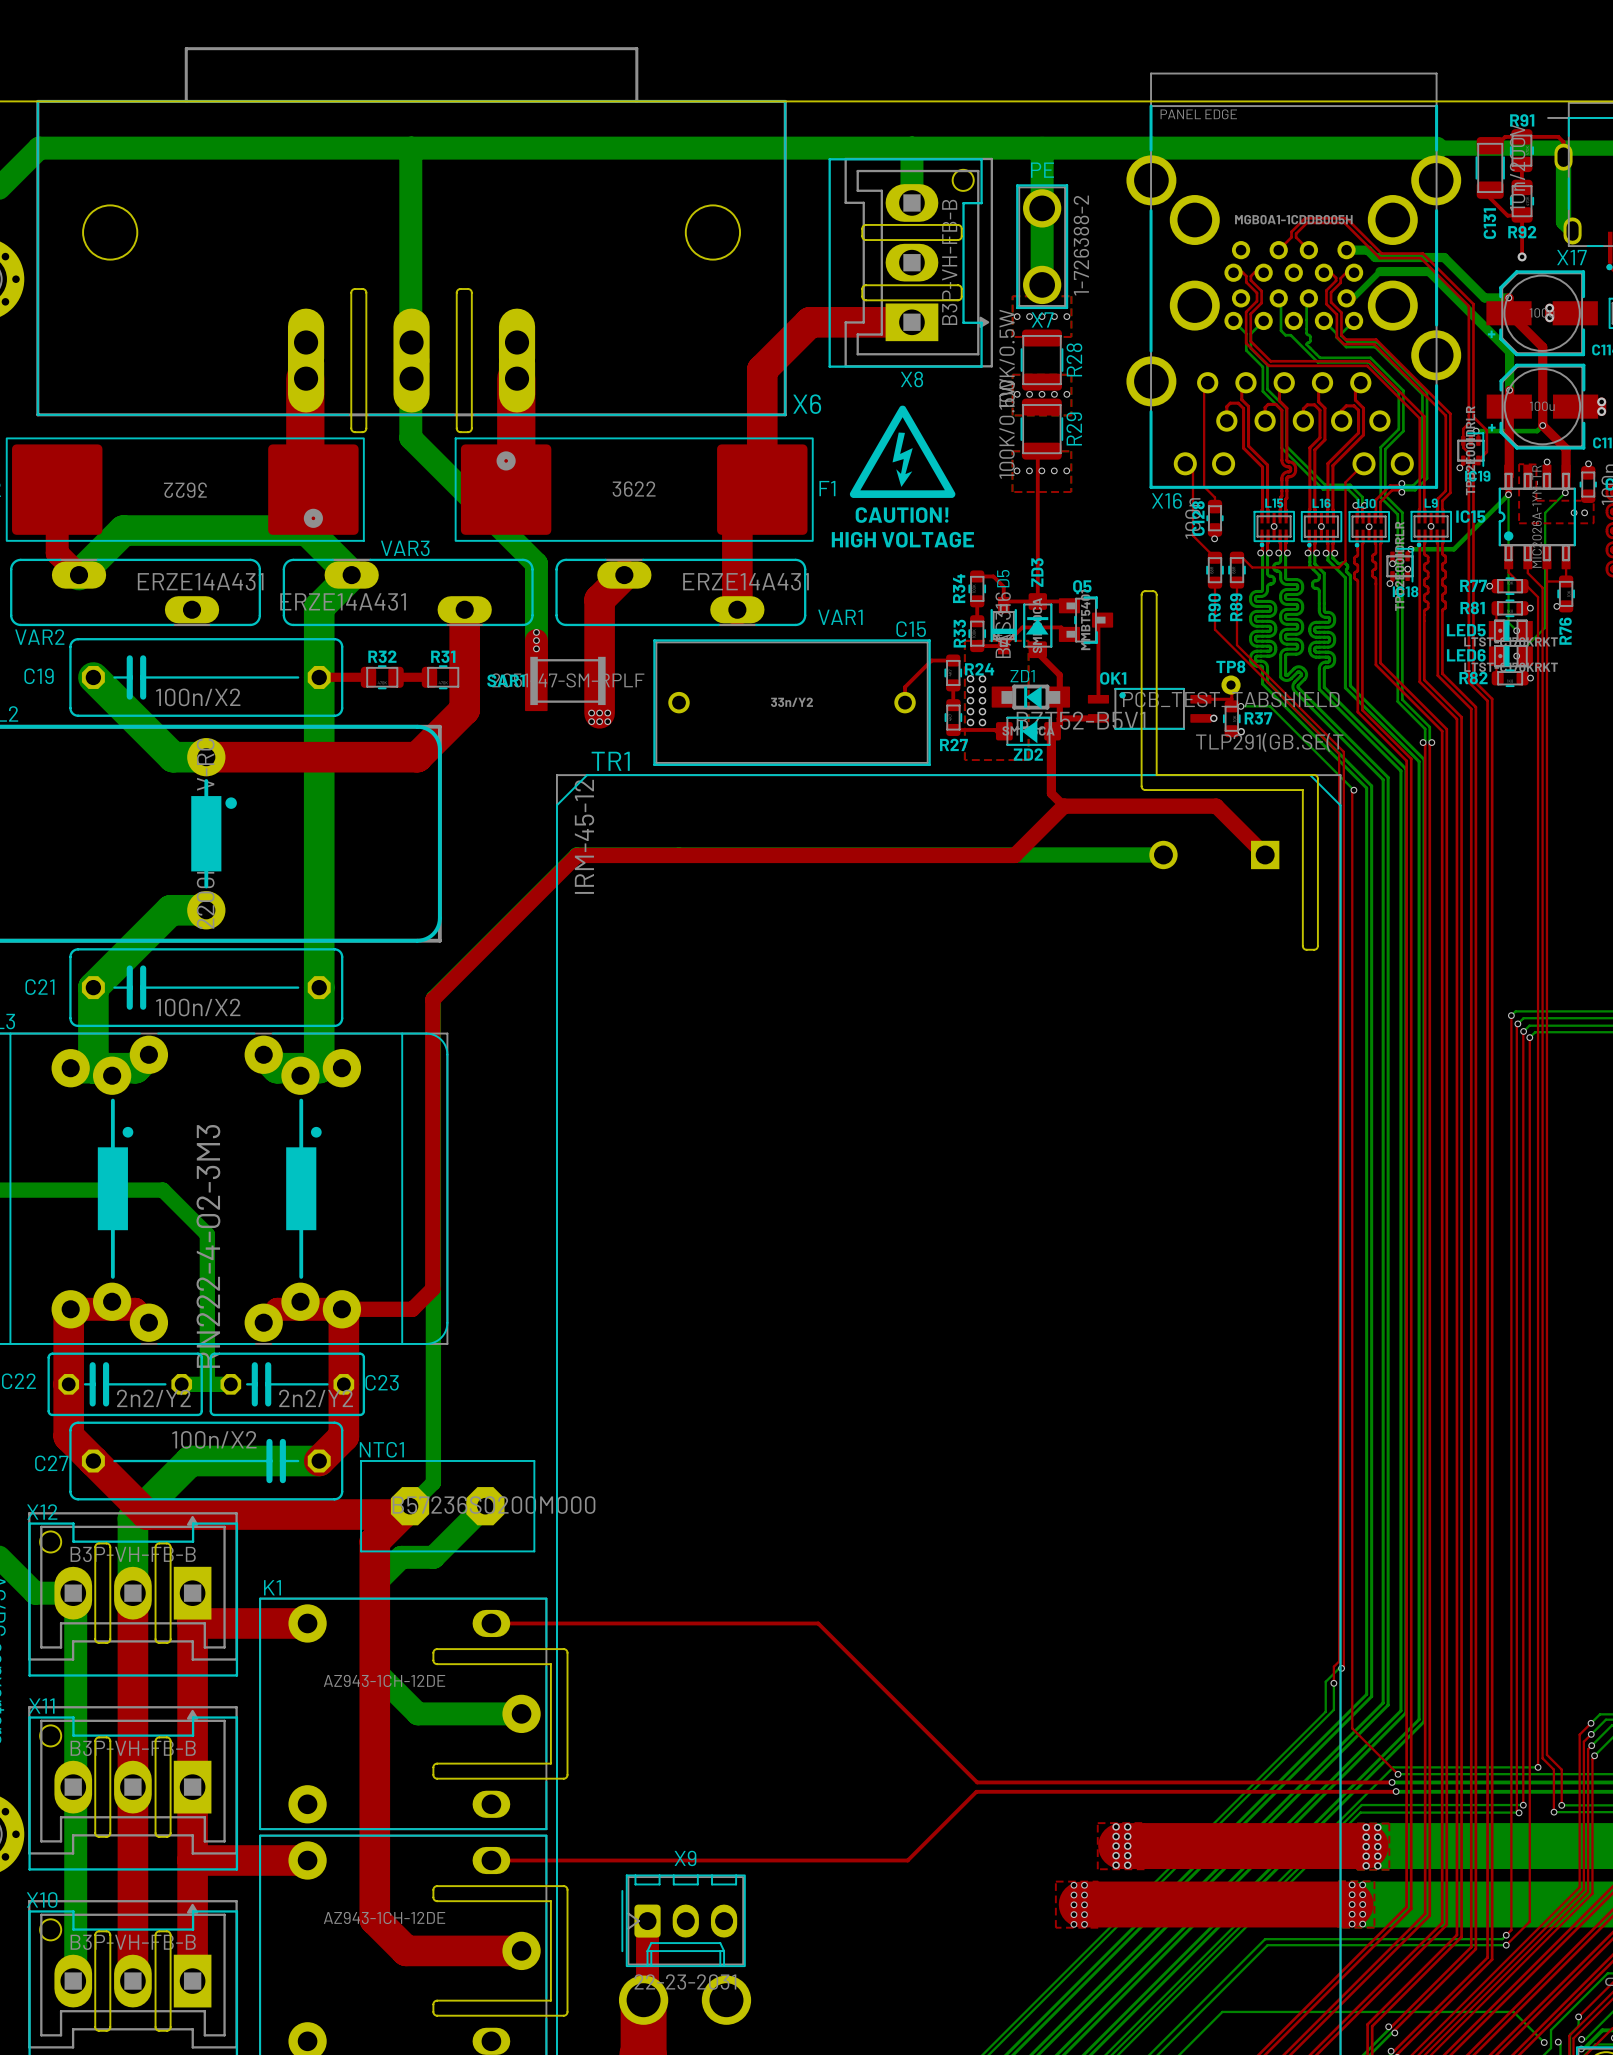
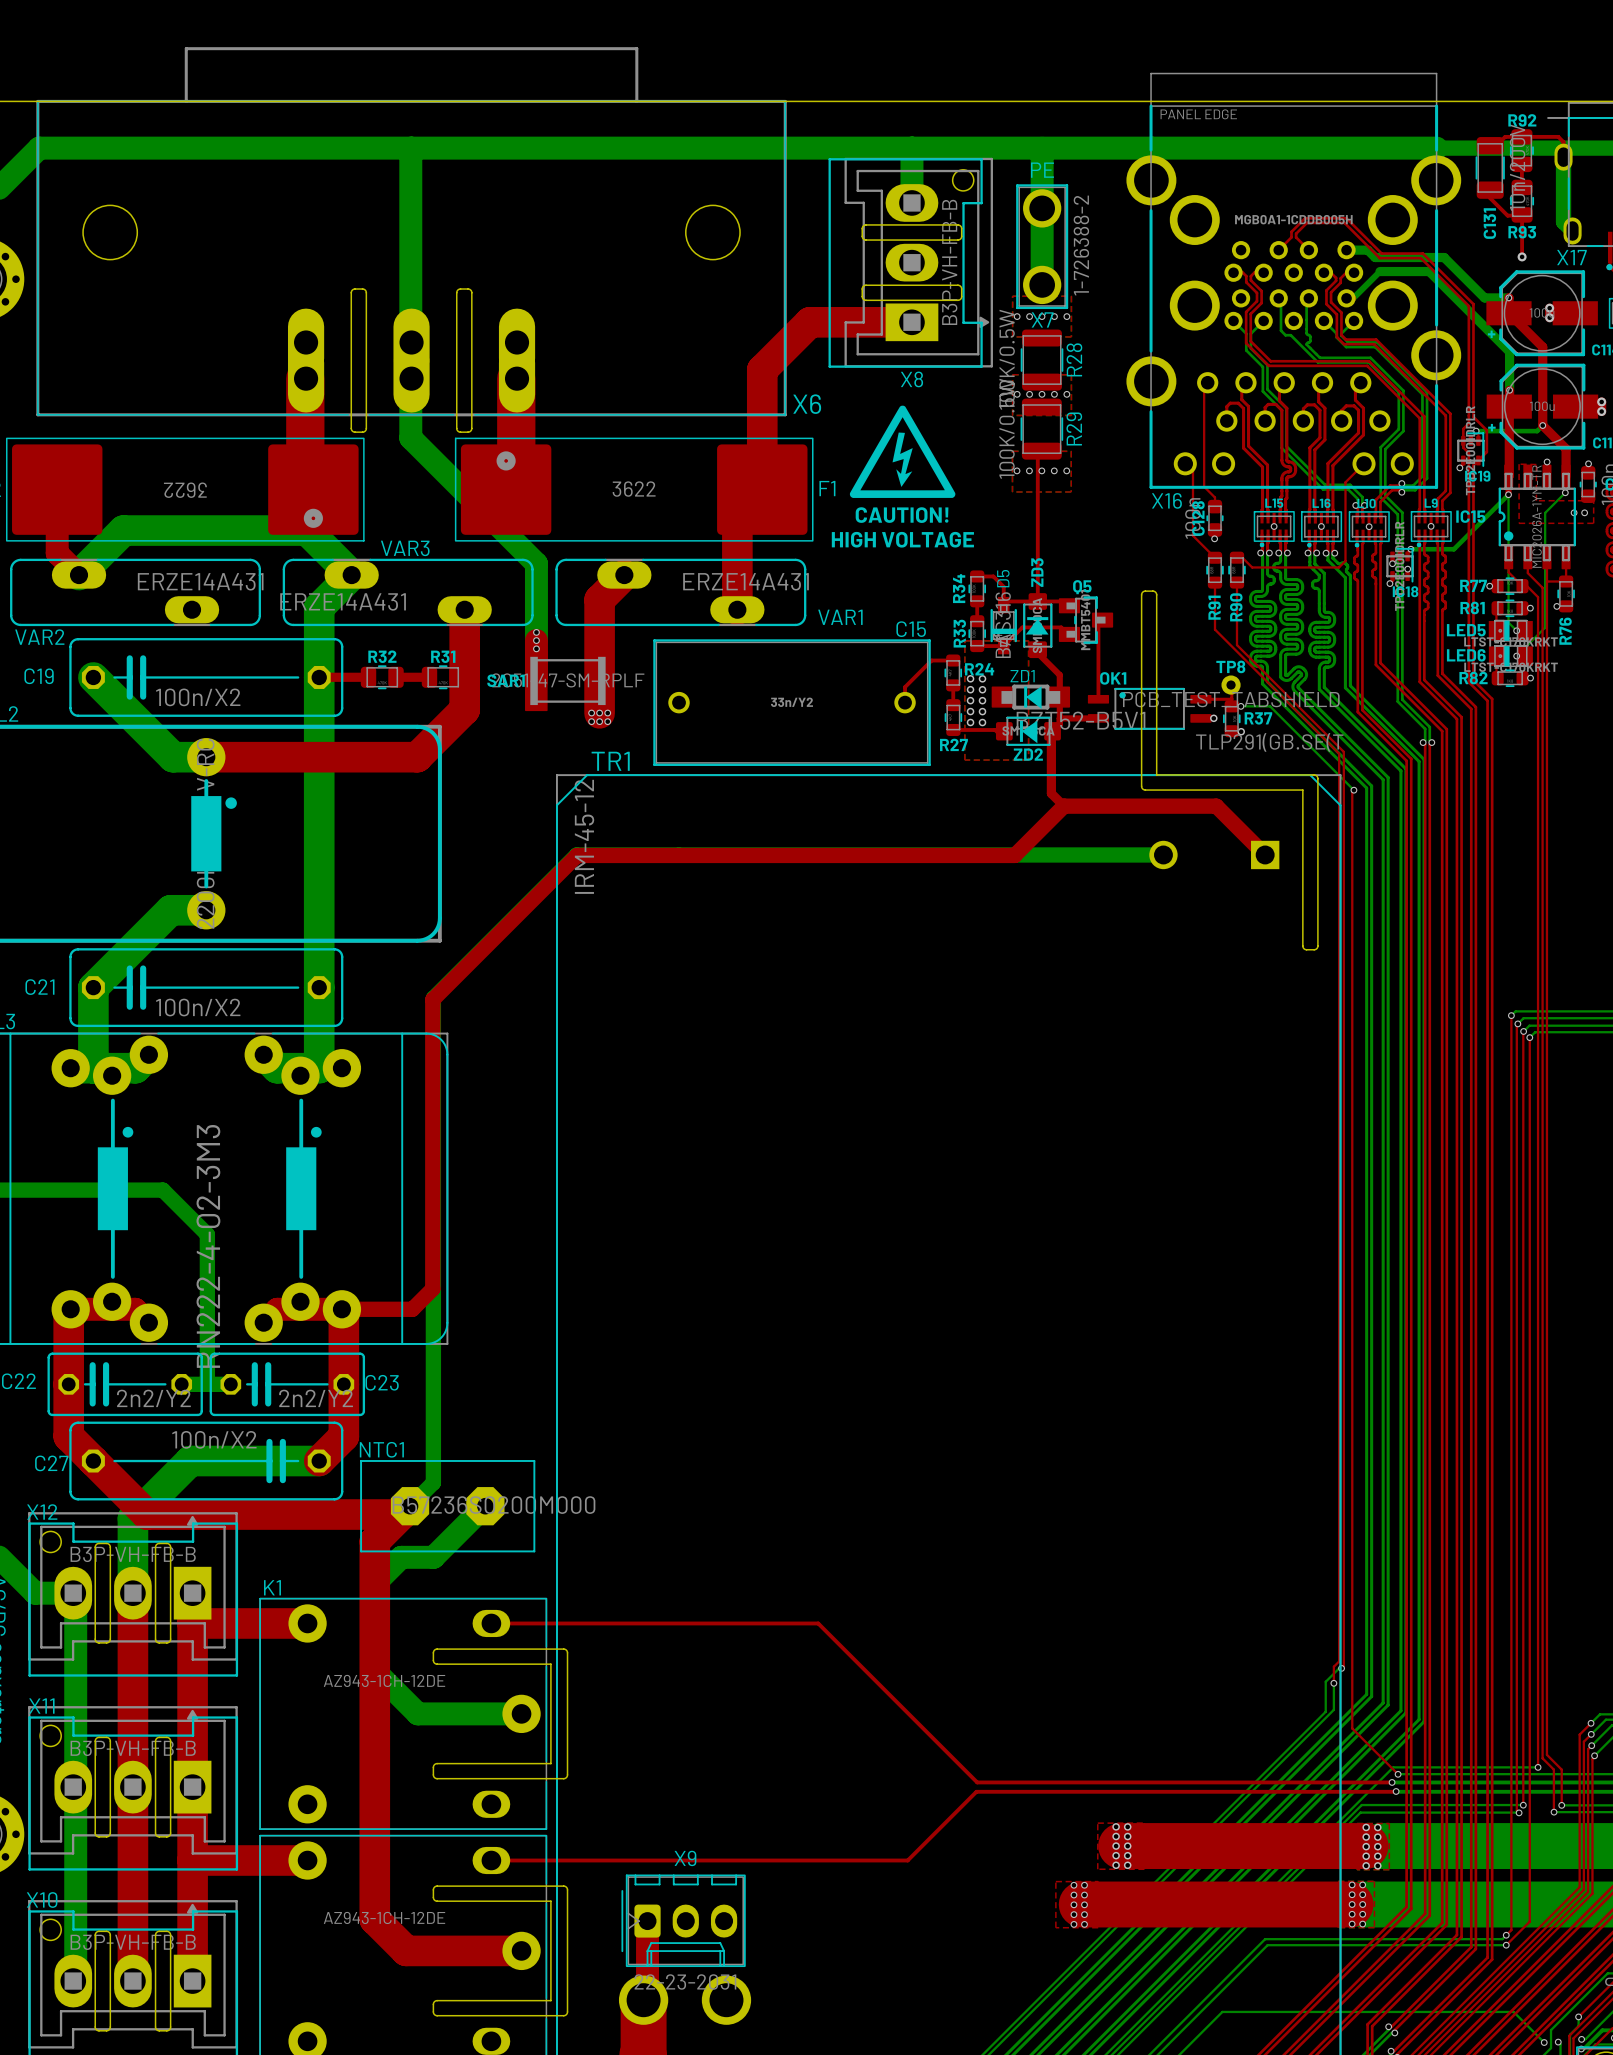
R91 name: R91 (1522, 120) -> R92 (1522, 120)
R92 name: R92 (1522, 232) -> R93 (1522, 232)
R90 name: R90 (1214, 607) -> R91 (1214, 607)
R89 name: R89 (1236, 607) -> R90 (1236, 607)

